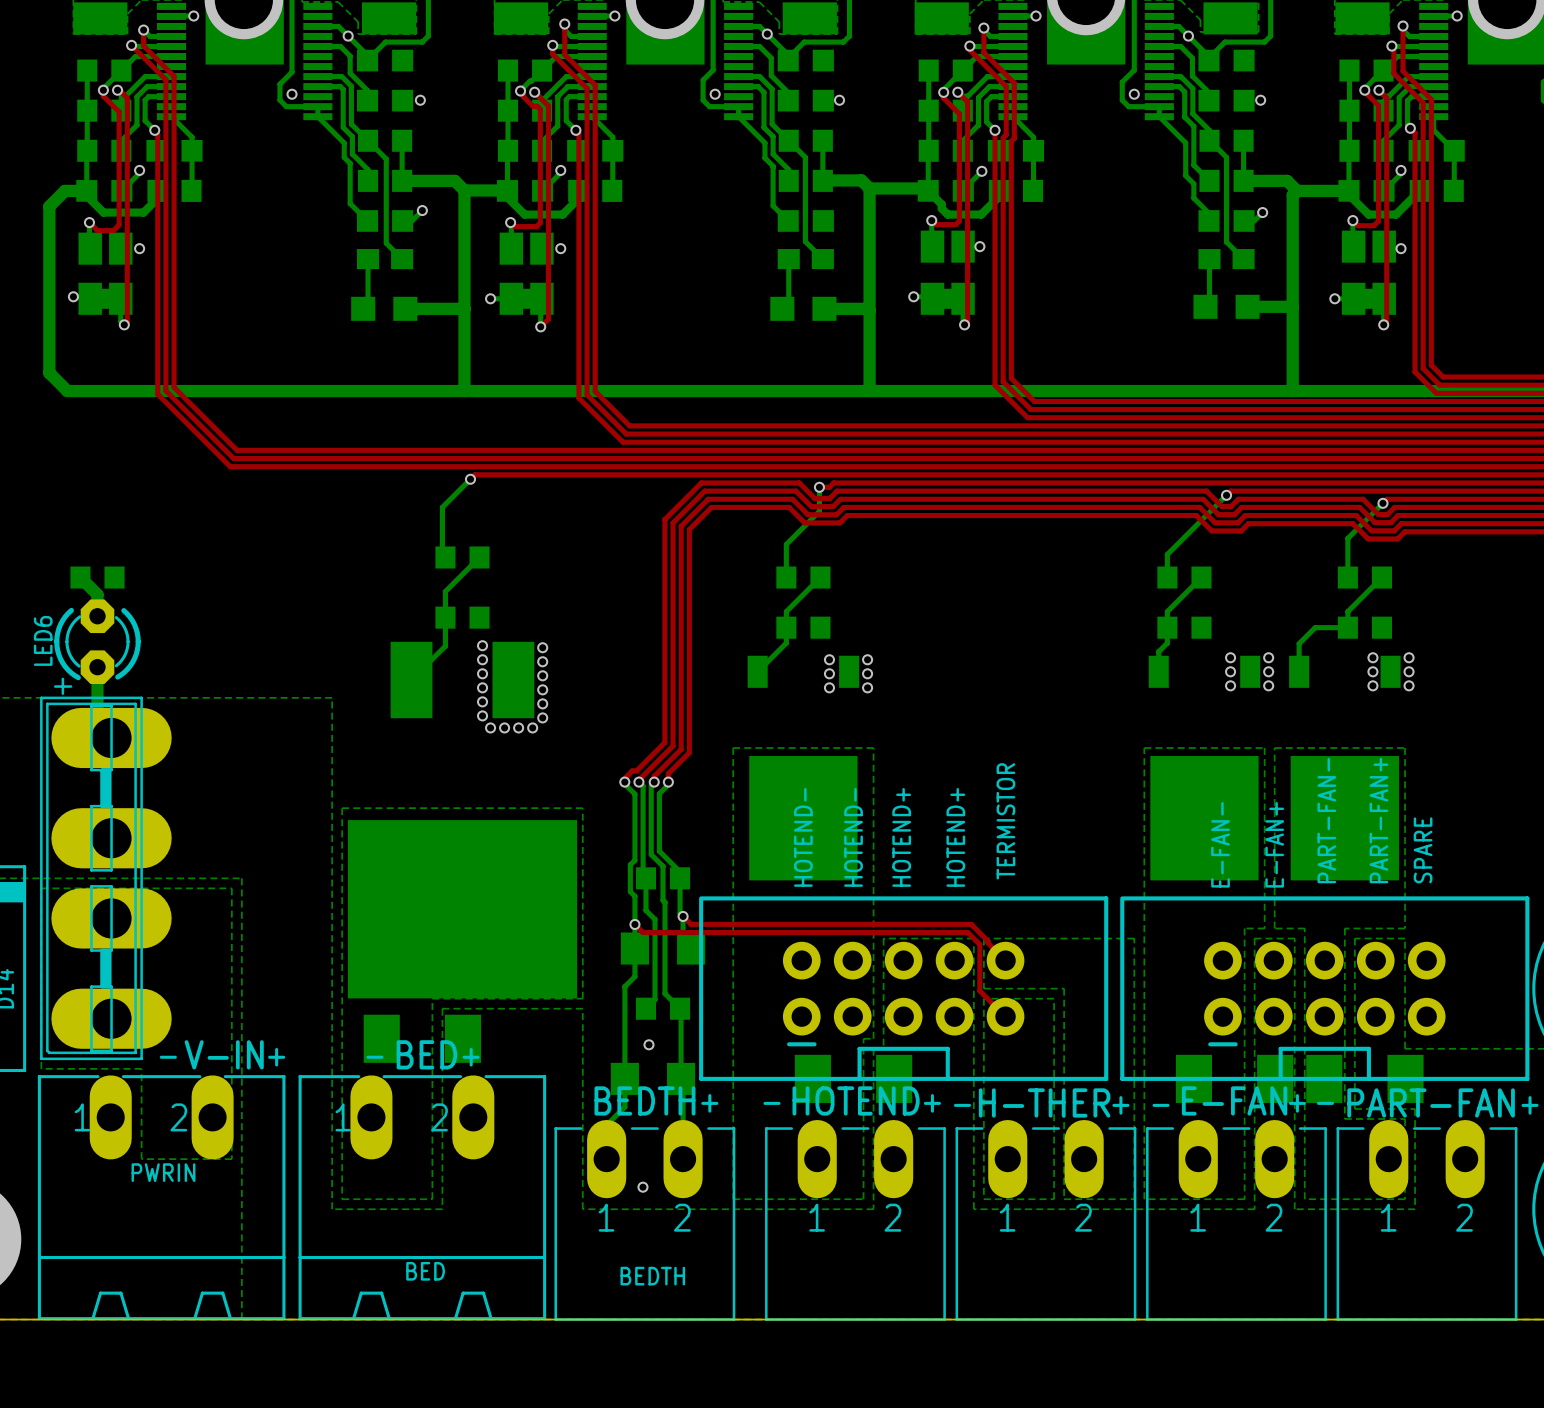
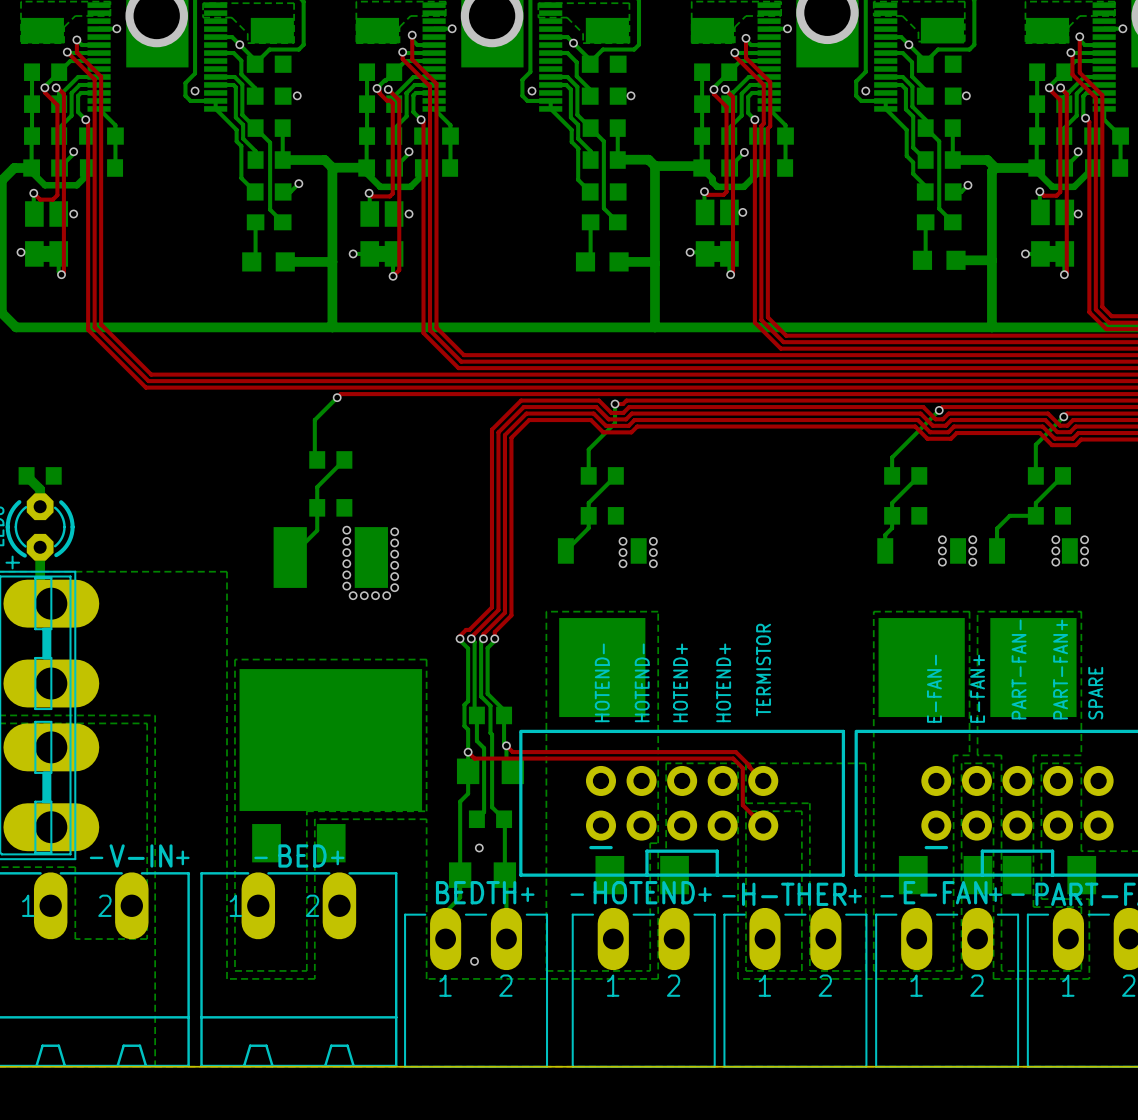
PWRIN name: PWRIN (163, 1172) -> none
BED name: BED (425, 1271) -> none
BEDTH name: BEDTH (652, 1276) -> none

